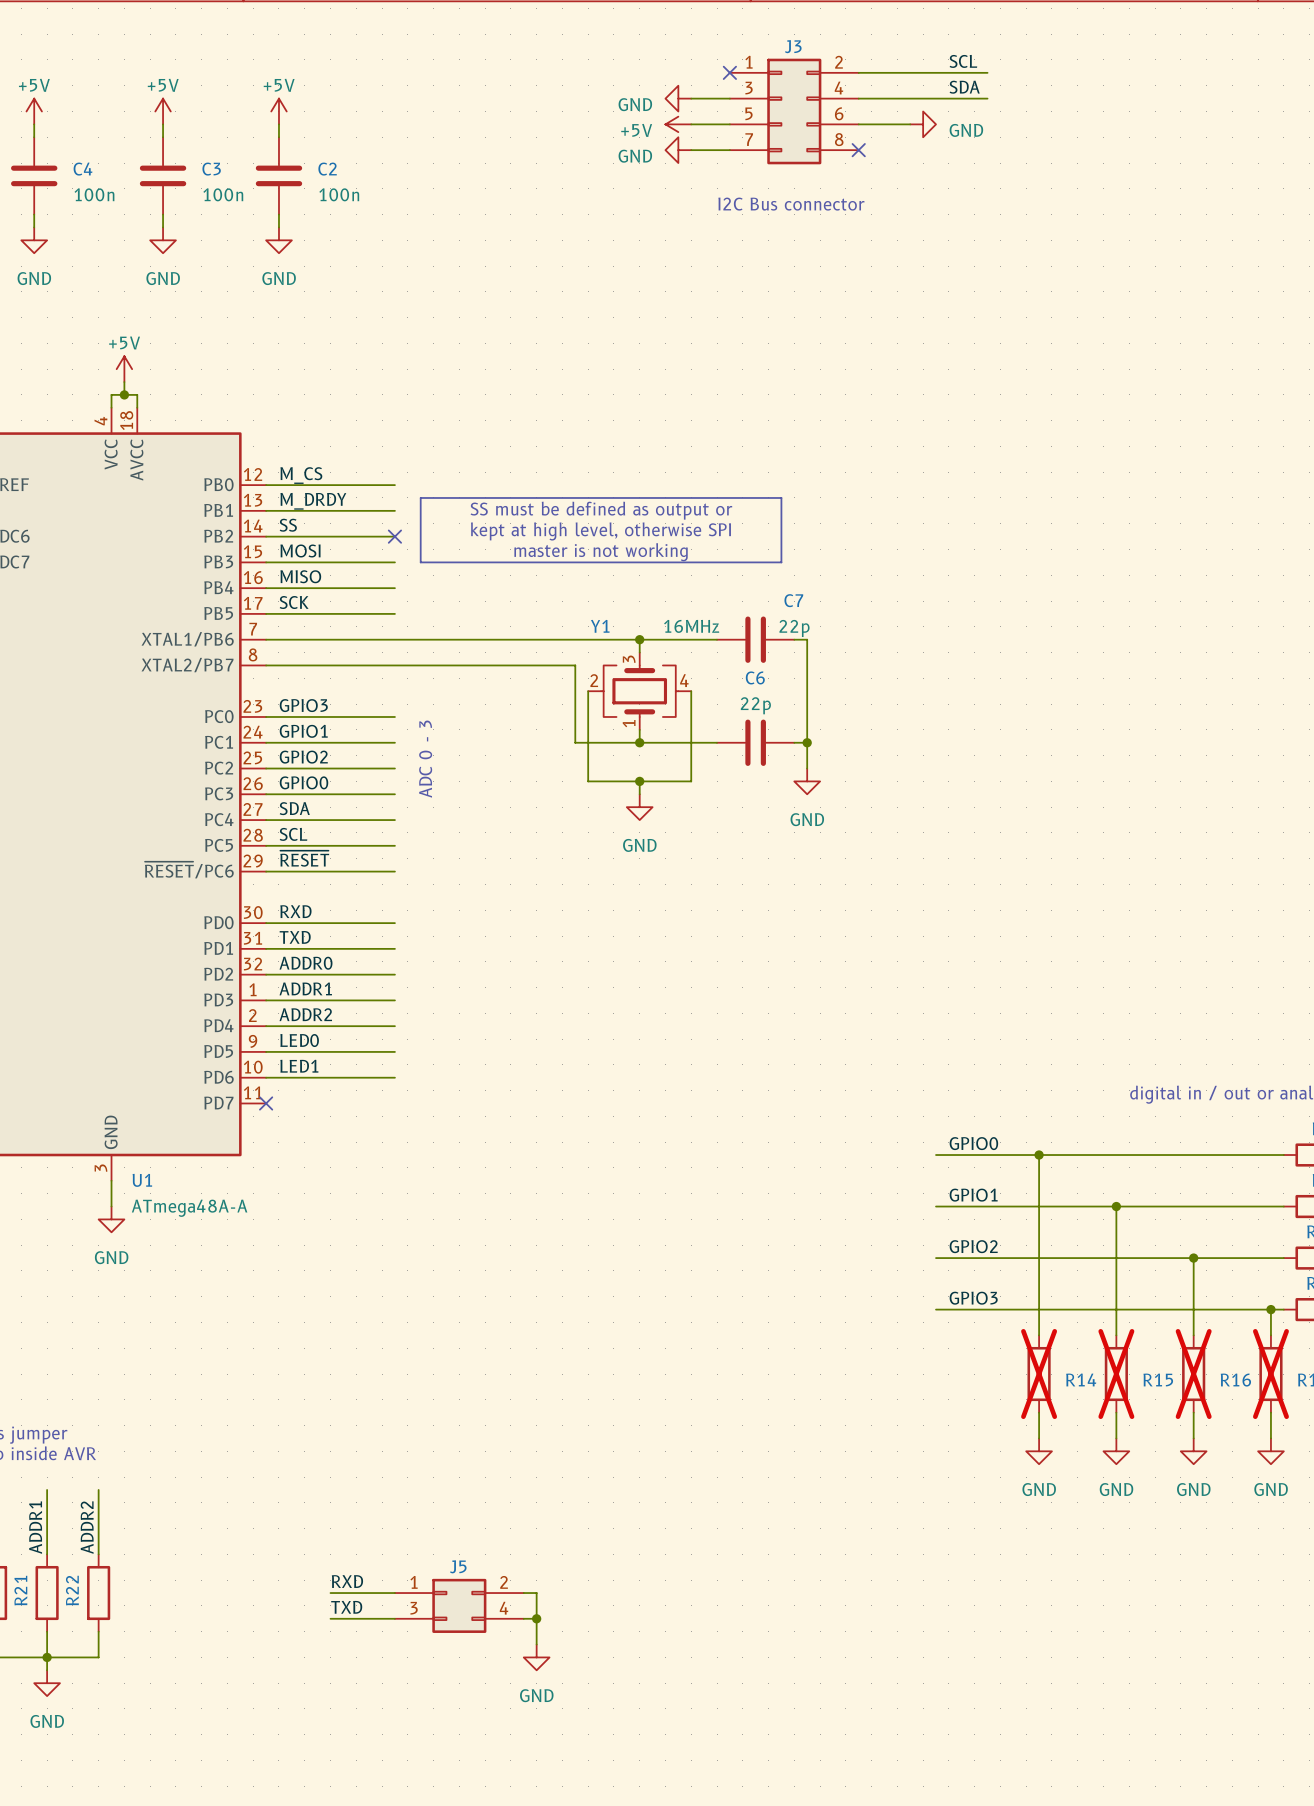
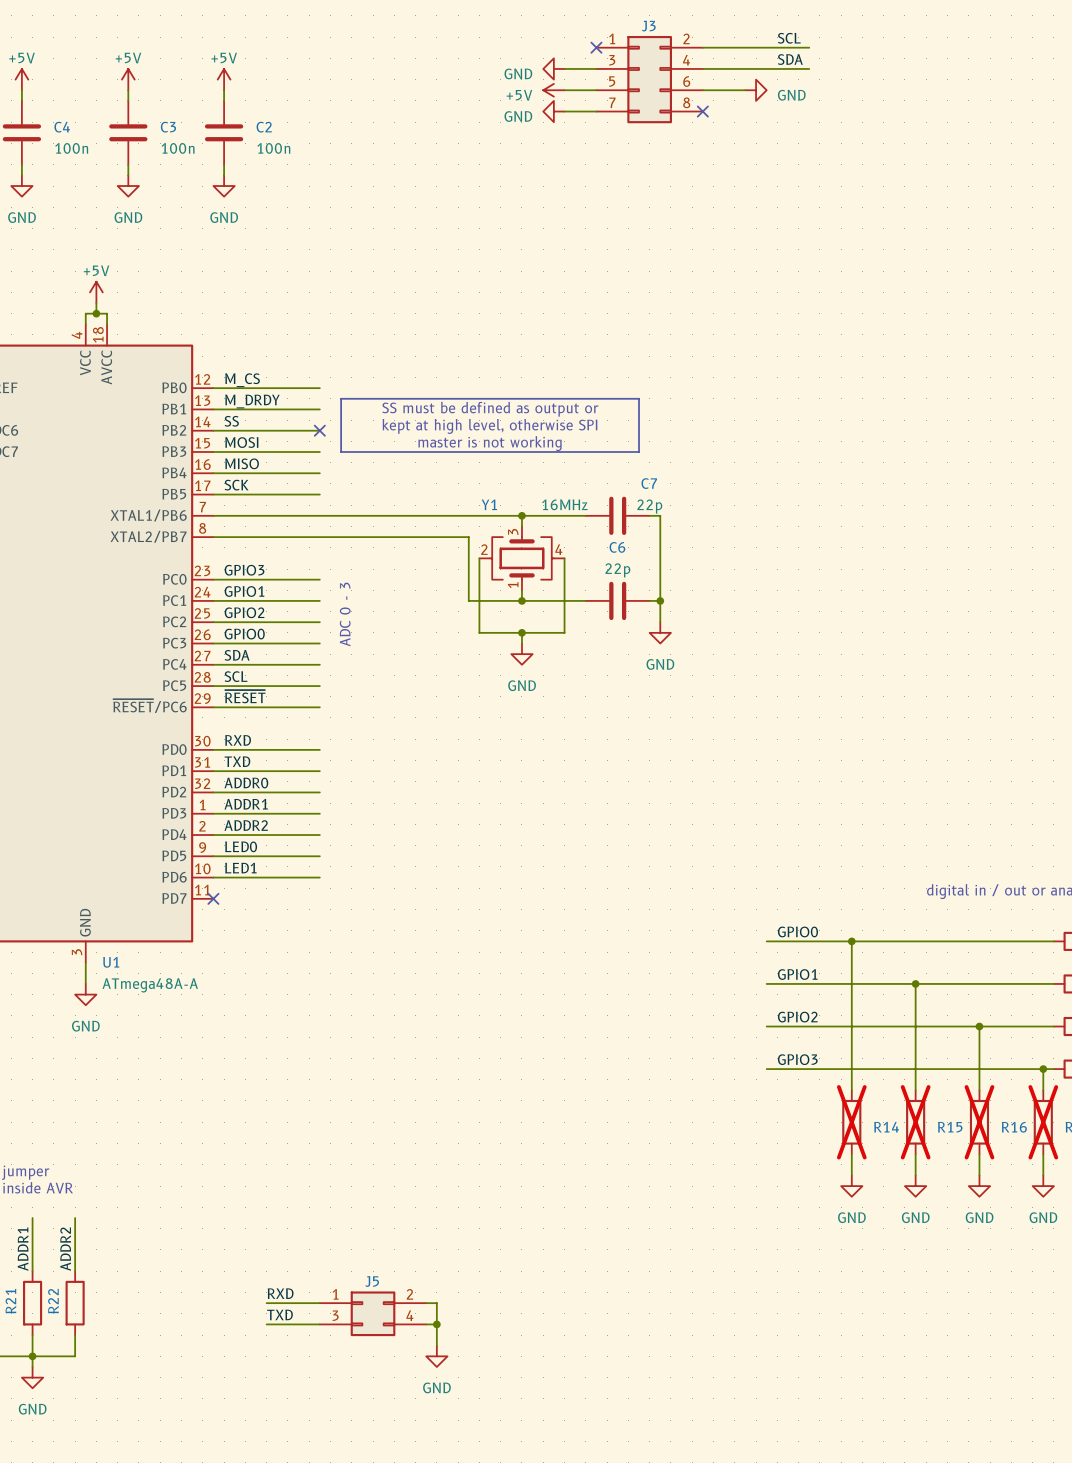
text: I2C Bus connector (791, 204) -> none

